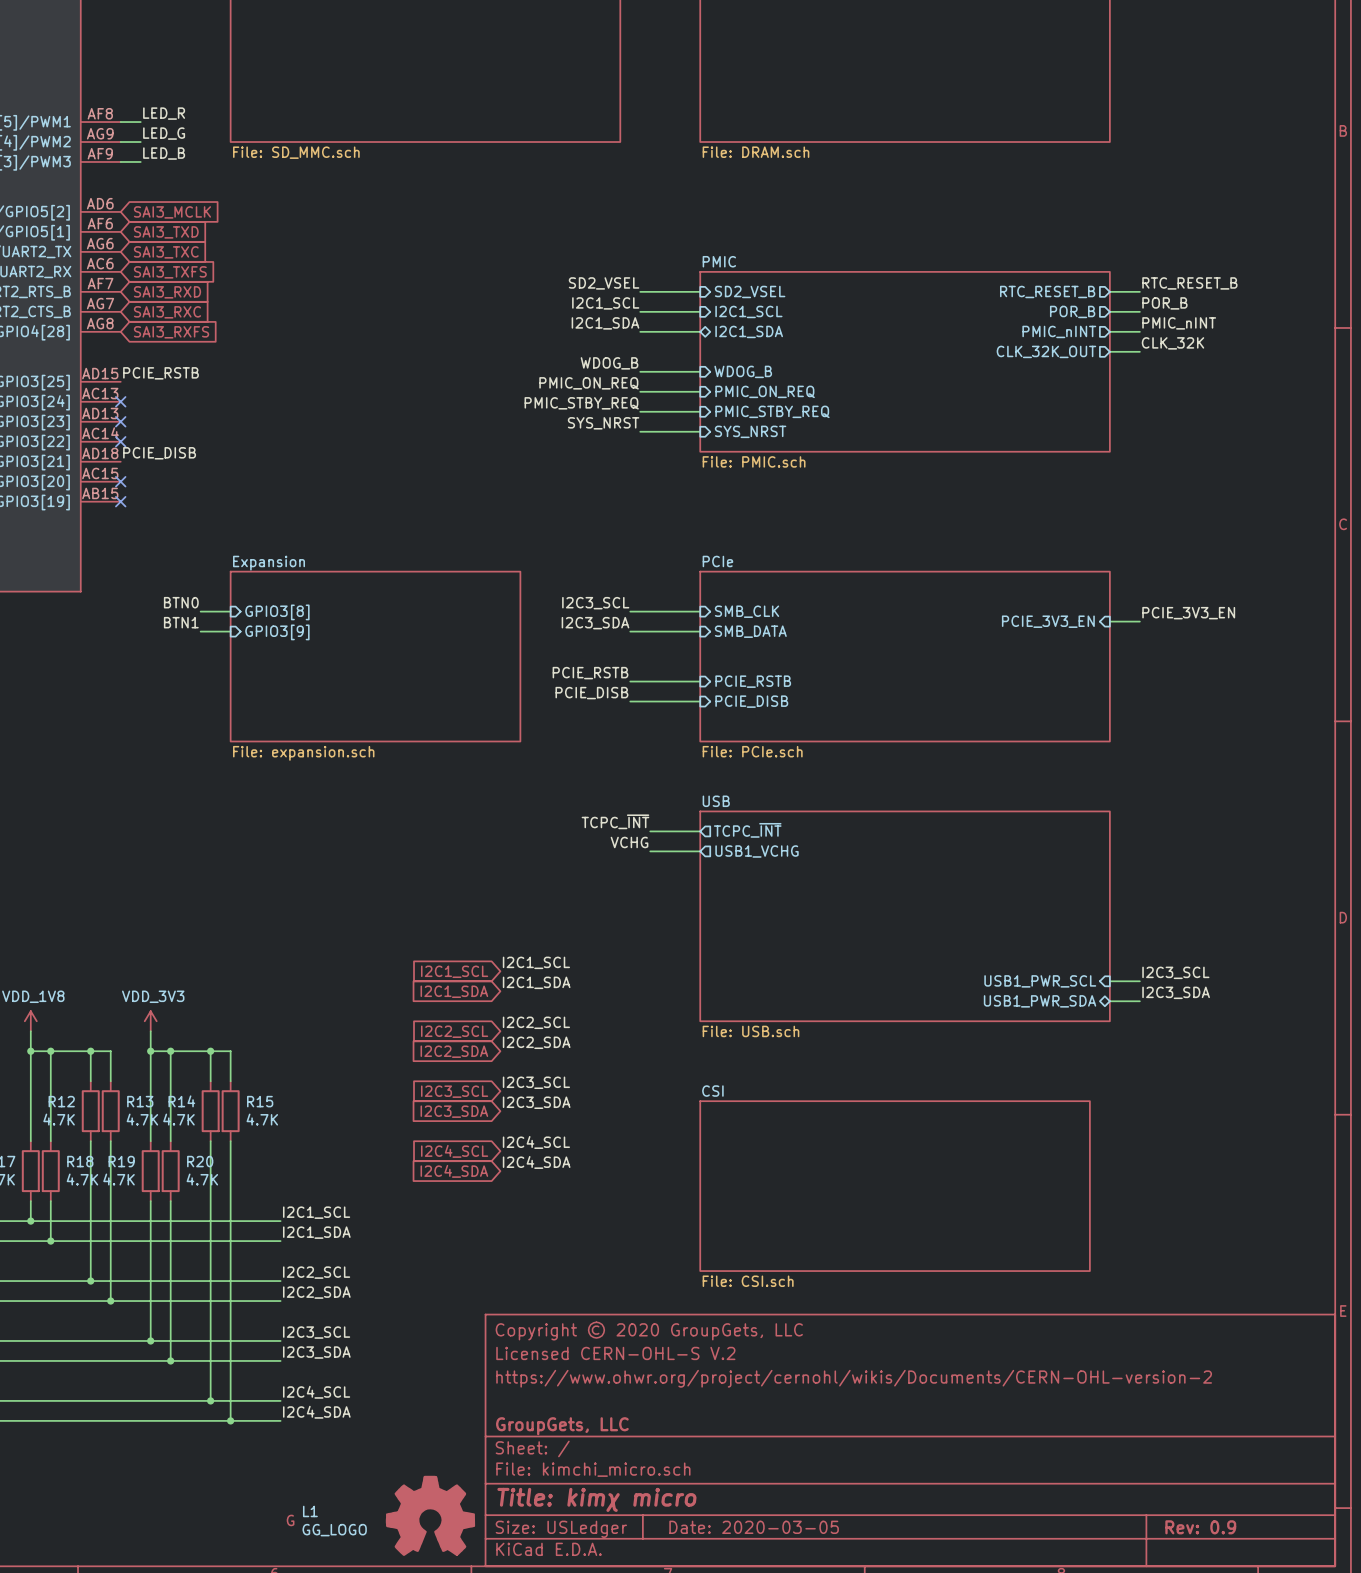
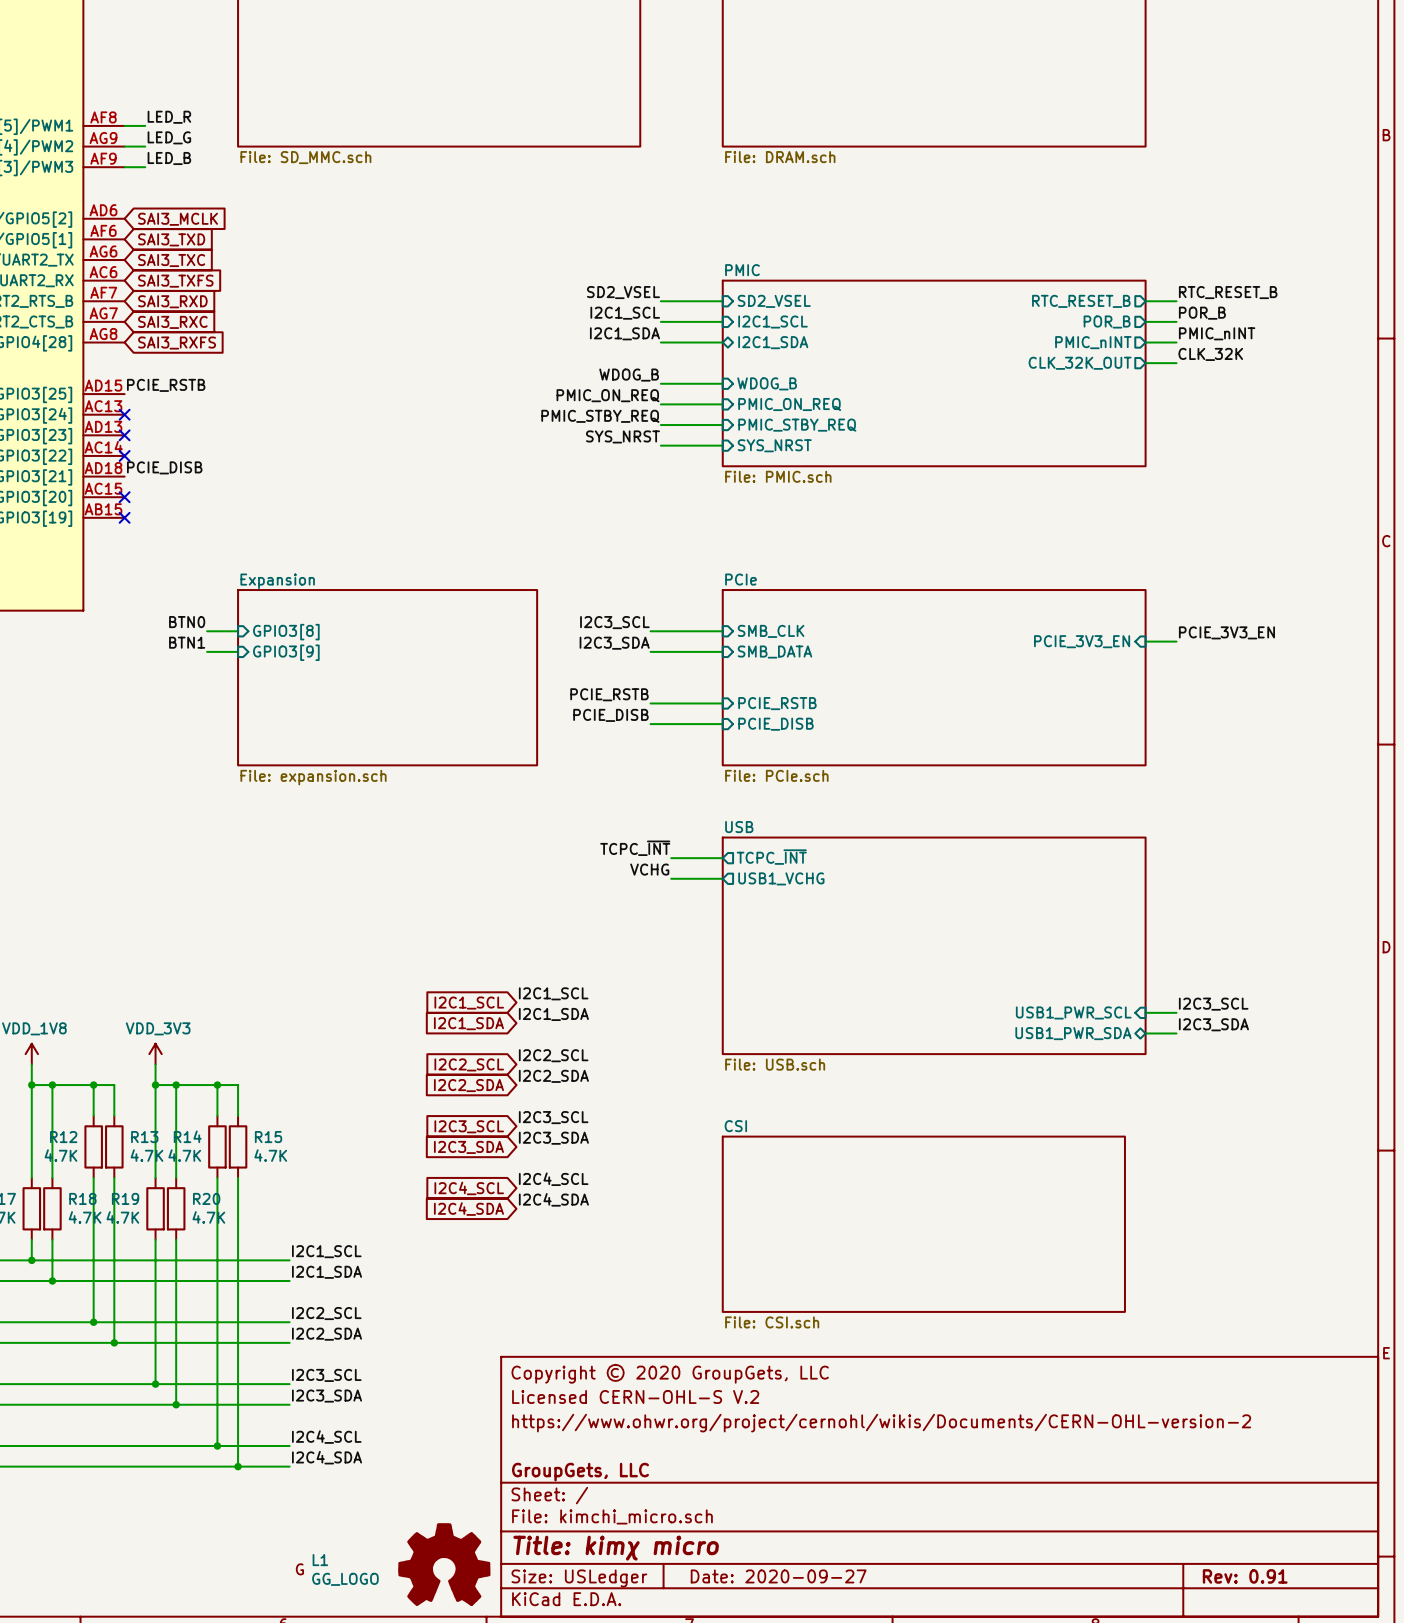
title block: Date: 2020-03-05 (754, 1527) -> Date: 2020-09-27 (778, 1576)
title block: Rev: 0.9 (1200, 1527) -> Rev: 0.91 (1245, 1576)

